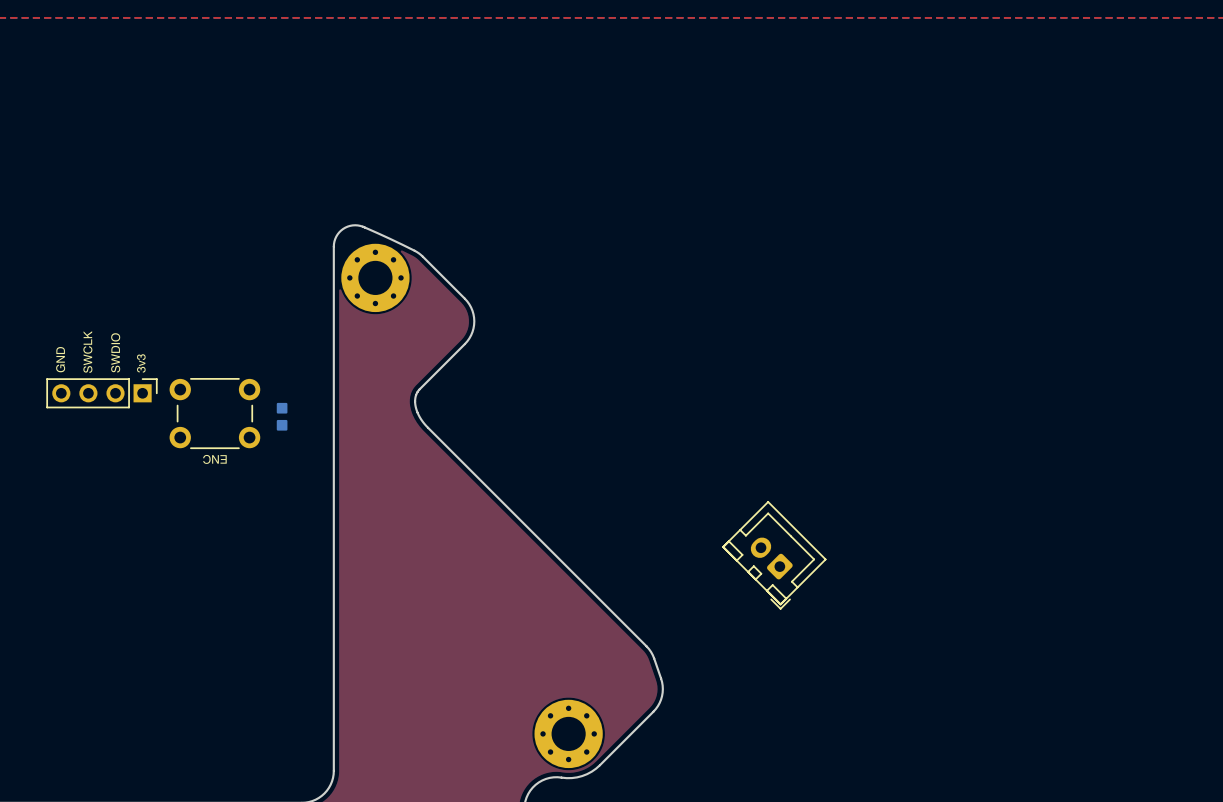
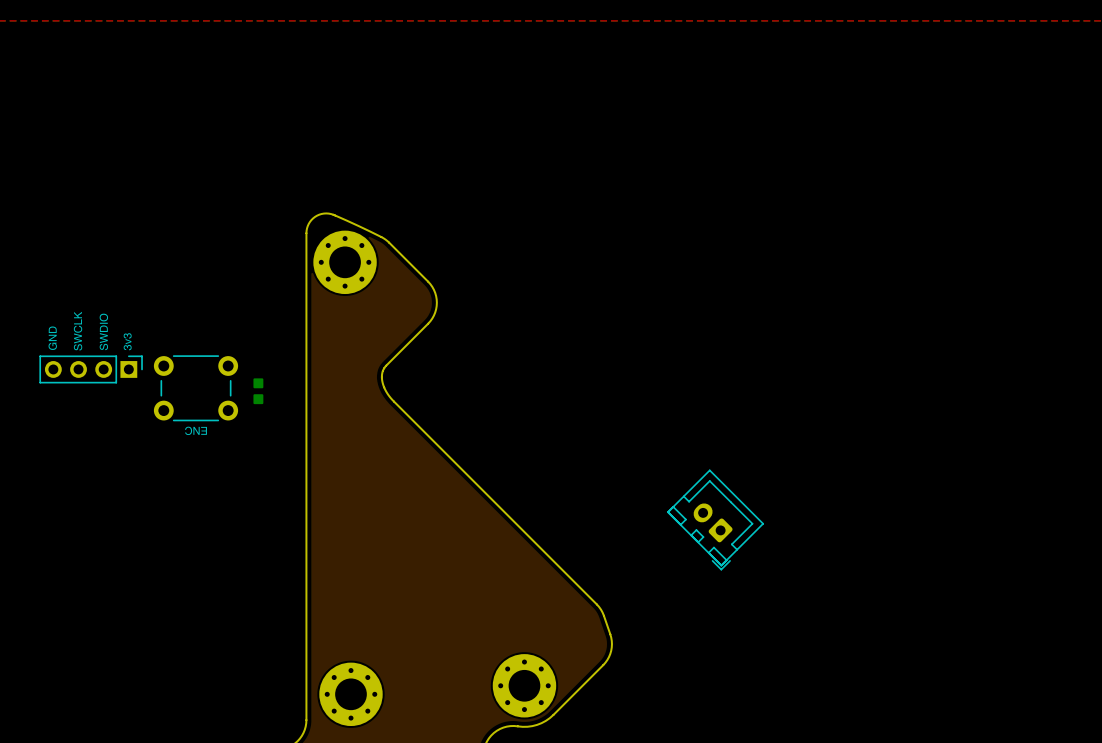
part: none -> (351, 694)

